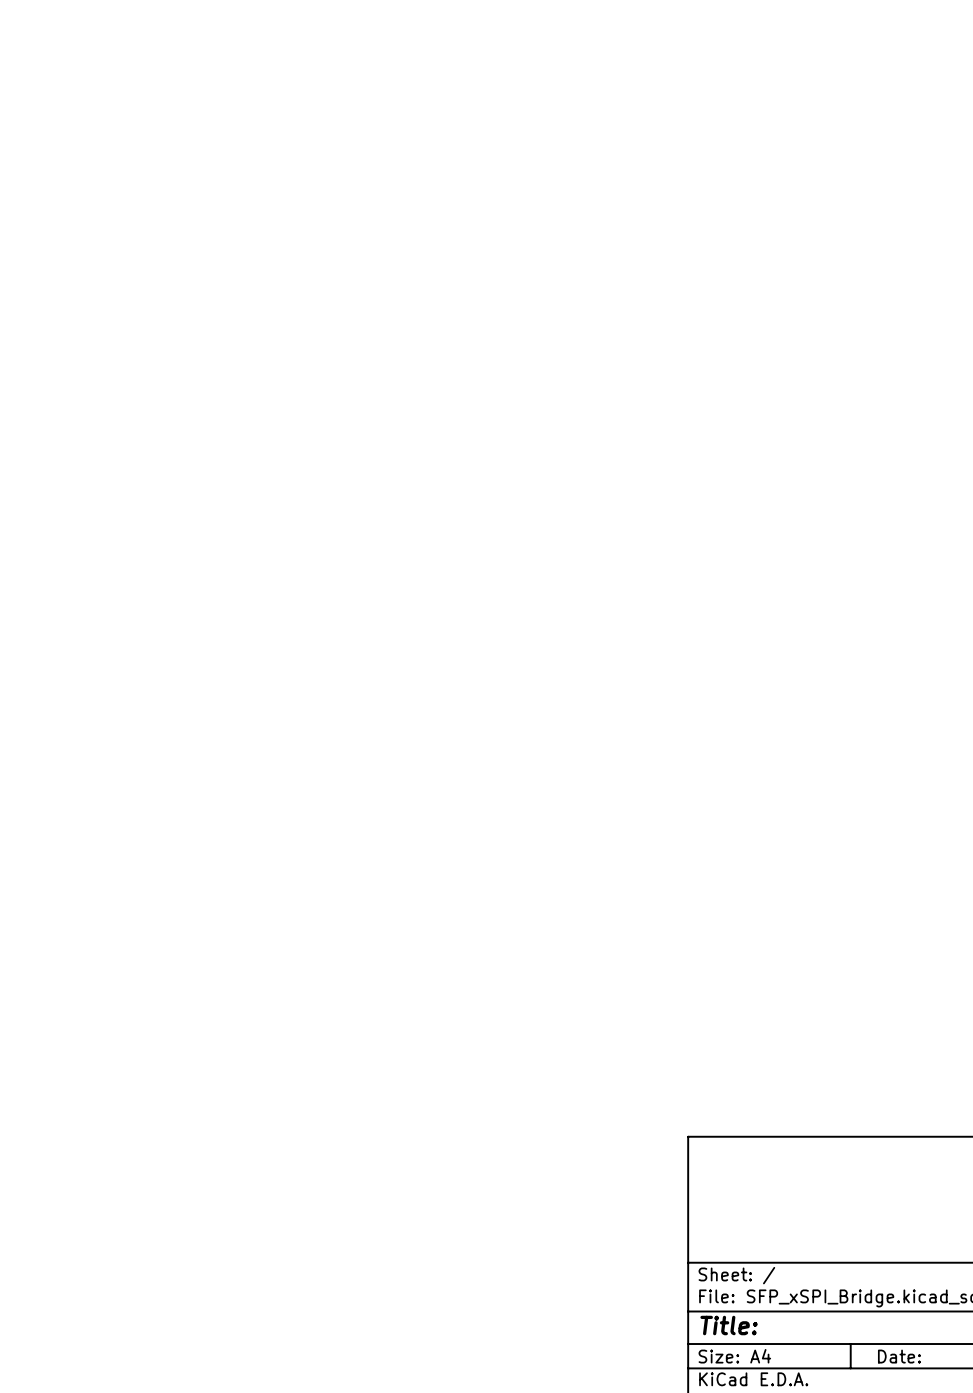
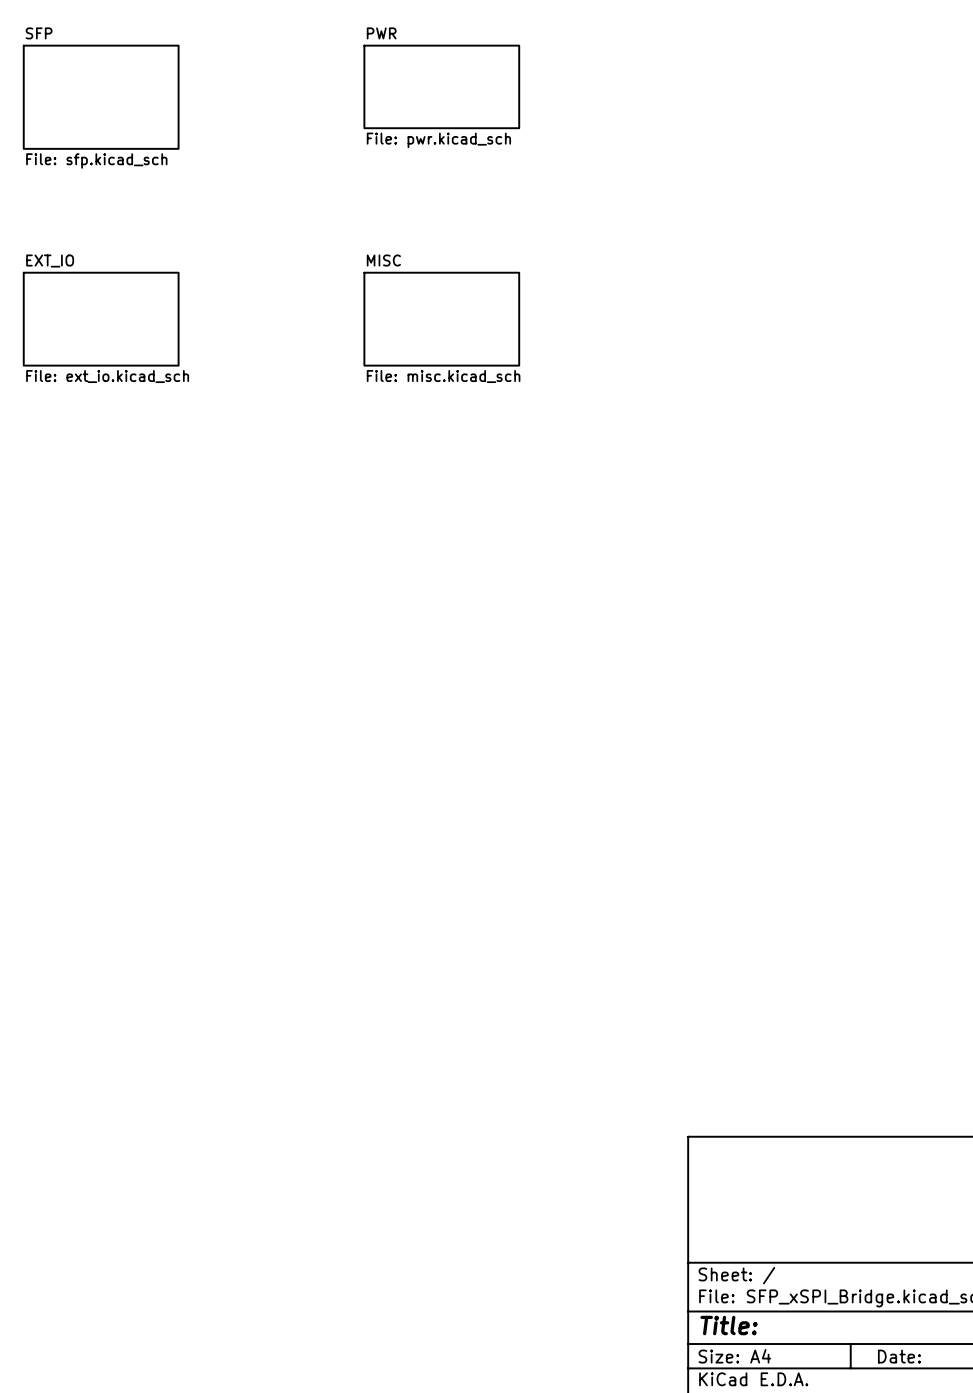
sheet PWR: none -> File: pwr.kicad_sch (441, 86)
sheet SFP: none -> File: sfp.kicad_sch (101, 97)
sheet EXT_IO: none -> File: ext_io.kicad_sch (101, 319)
sheet MISC: none -> File: misc.kicad_sch (441, 319)

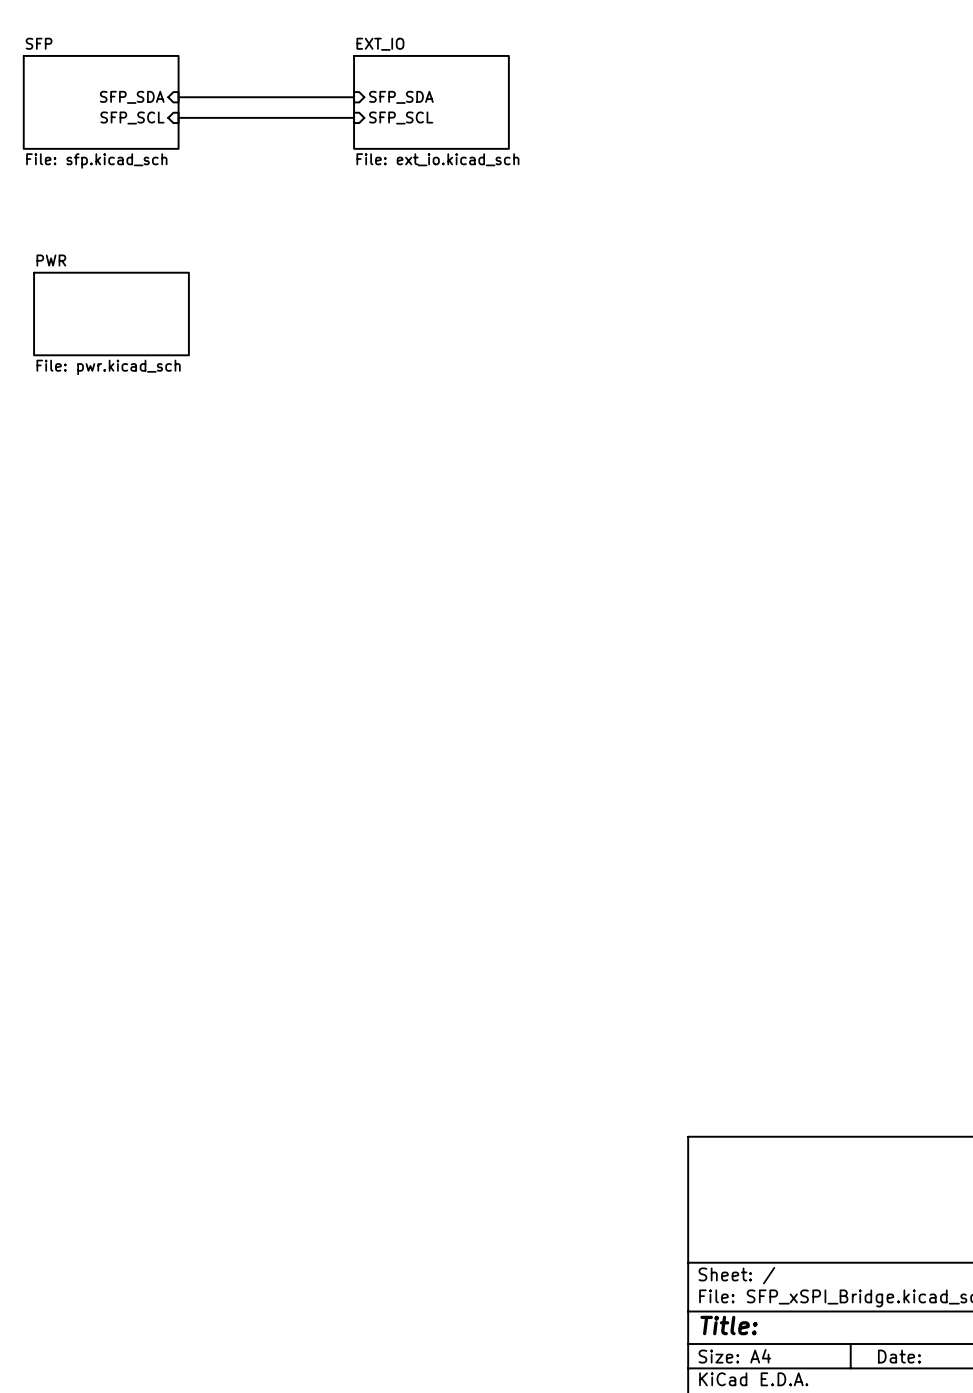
sheet SFP shape: [23, 45, 180, 150] -> [23, 55, 180, 150]
sheet PWR: File: pwr.kicad_sch (441, 86) -> none
sheet pin: none -> SFP_SDA (132, 97)
wire: none -> (178, 97) (354, 97)
sheet pin: none -> SFP_SDA (401, 97)
sheet EXT_IO: none -> File: ext_io.kicad_sch (431, 102)
sheet pin: none -> SFP_SCL (132, 117)
wire: none -> (178, 117) (354, 117)
sheet pin: none -> SFP_SCL (401, 117)
sheet PWR: none -> File: pwr.kicad_sch (111, 314)
sheet EXT_IO: File: ext_io.kicad_sch (101, 319) -> none
sheet MISC: File: misc.kicad_sch (441, 319) -> none

